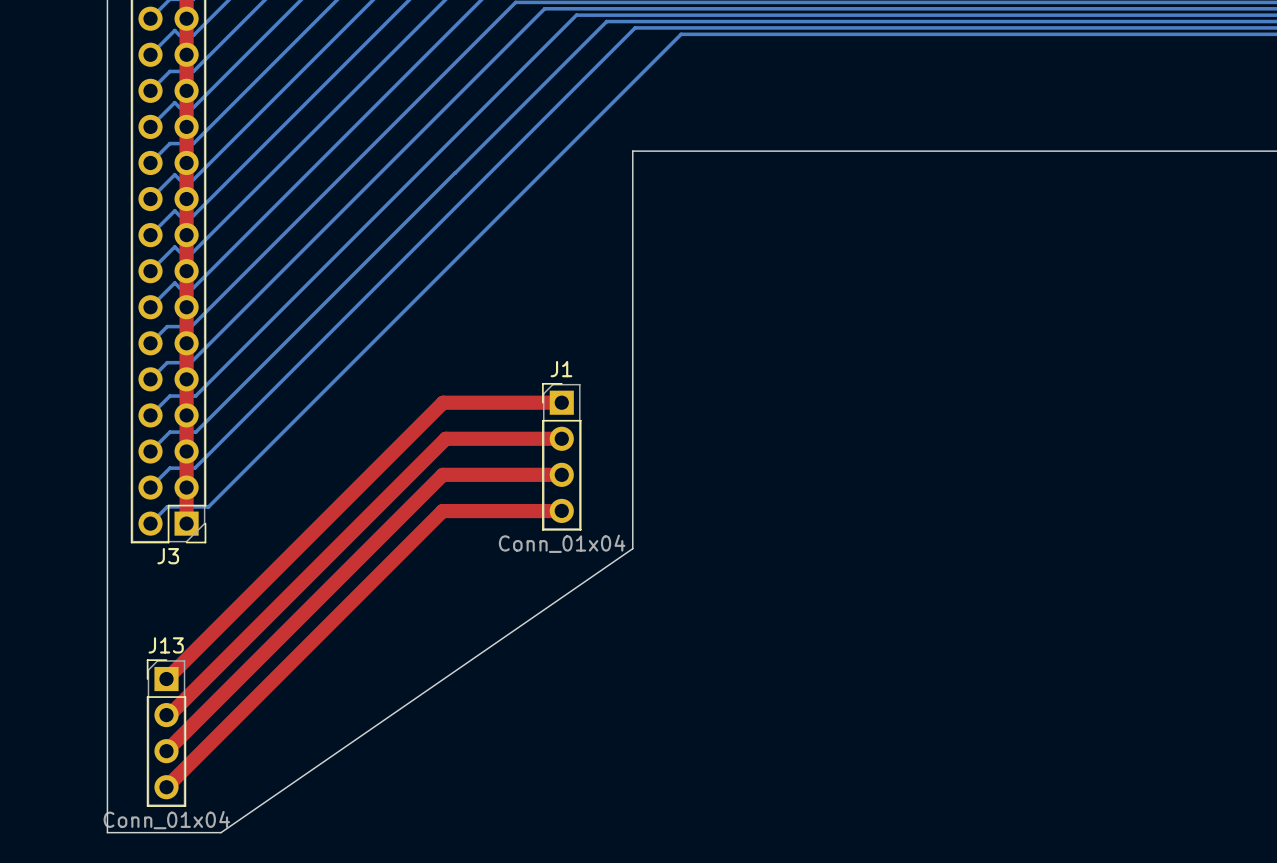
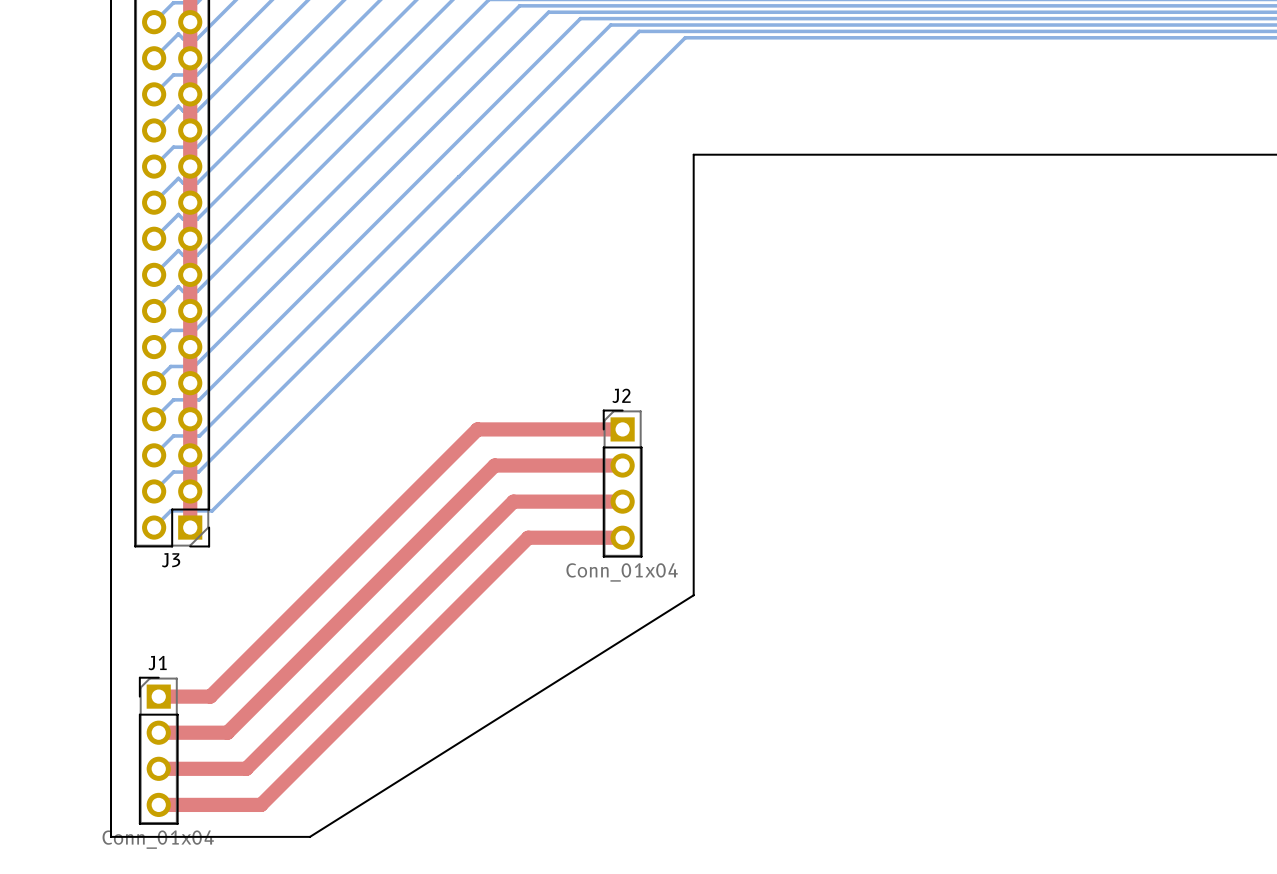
board edge: (689, 151) (632, 151) (632, 548) (221, 832) -> (693, 154) (693, 595) (309, 836) (224, 836)
top track: (561, 402) (443, 402) (166, 679) -> none
top track: none -> (622, 429) (477, 429) (210, 696) (158, 696)
top track: (561, 438) (445, 438) (169, 715) (166, 715) -> none
J1 position: (561, 456) -> (158, 750)
top track: none -> (622, 465) (494, 465) (227, 732) (158, 732)
top track: (561, 474) (442, 474) (166, 751) -> none
J2: none -> Conn_01x04 (622, 483)
top track: none -> (622, 501) (513, 501) (246, 768) (158, 768)
top track: (561, 511) (442, 511) (166, 787) -> none
top track: none -> (622, 537) (528, 537) (261, 804) (158, 804)
J13: Conn_01x04 (166, 733) -> none

